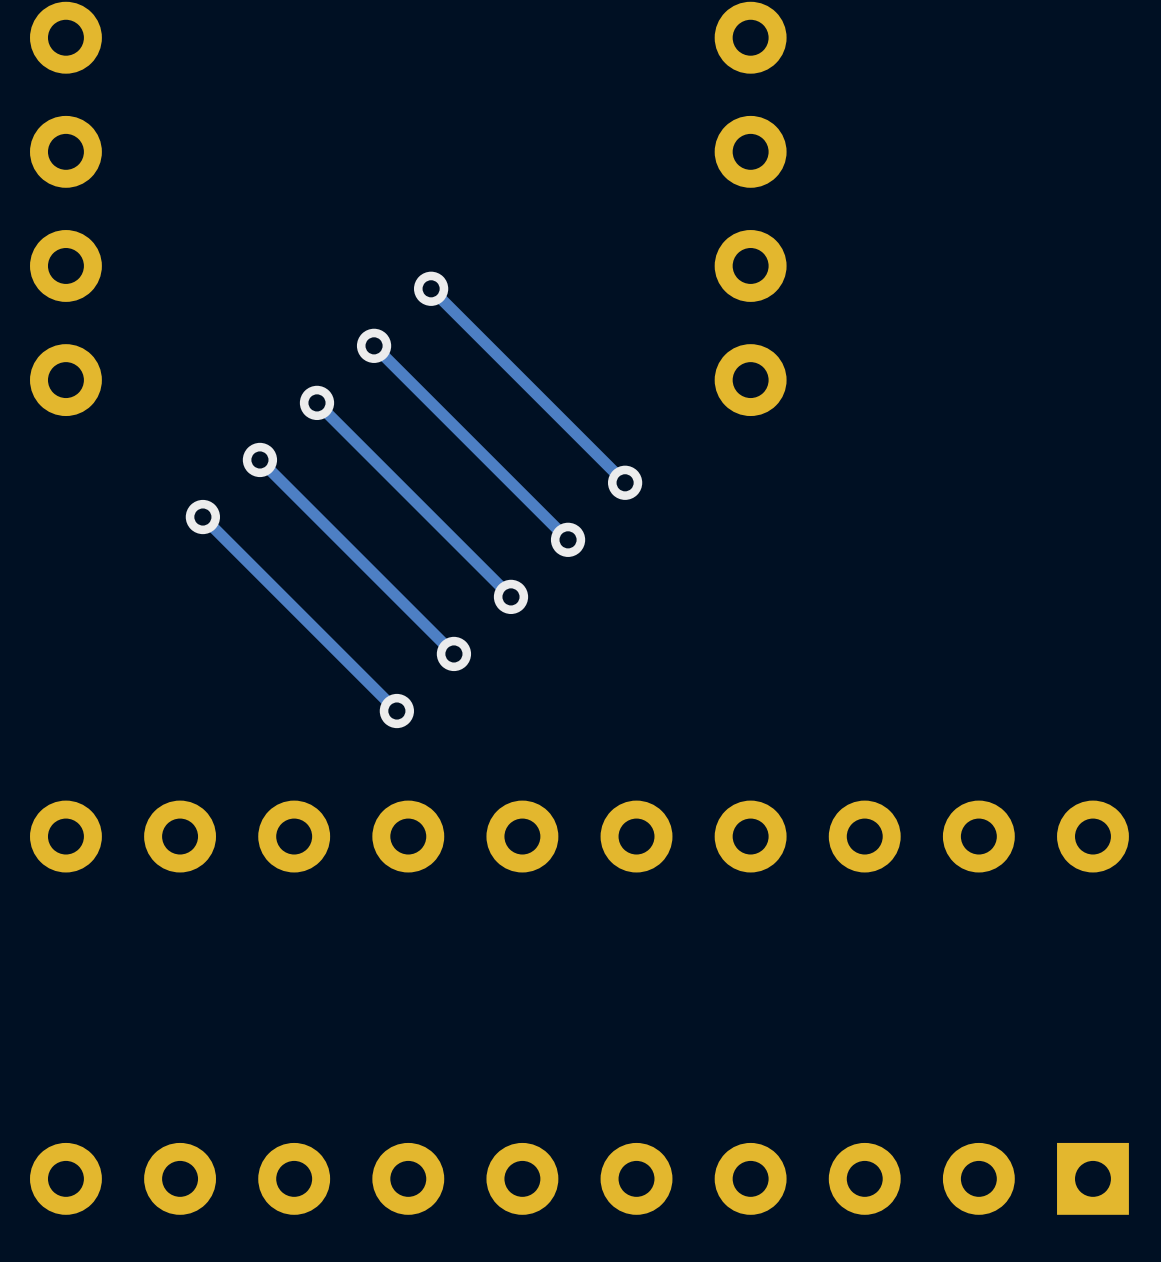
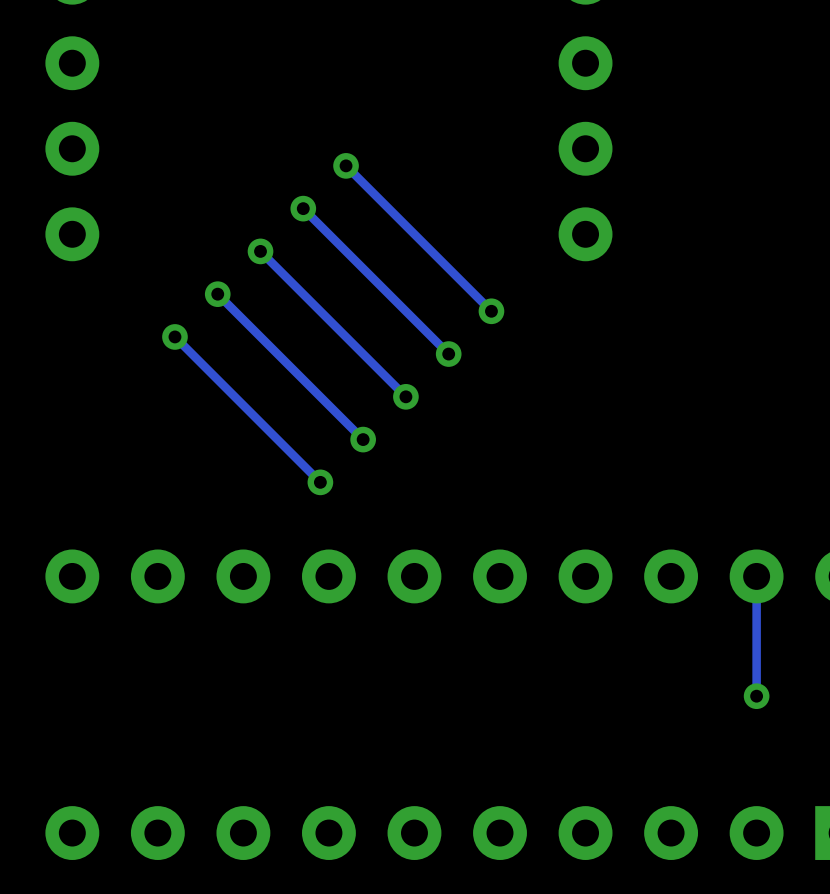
track: none -> (756, 576) (756, 696)
via: none -> (756, 696)

